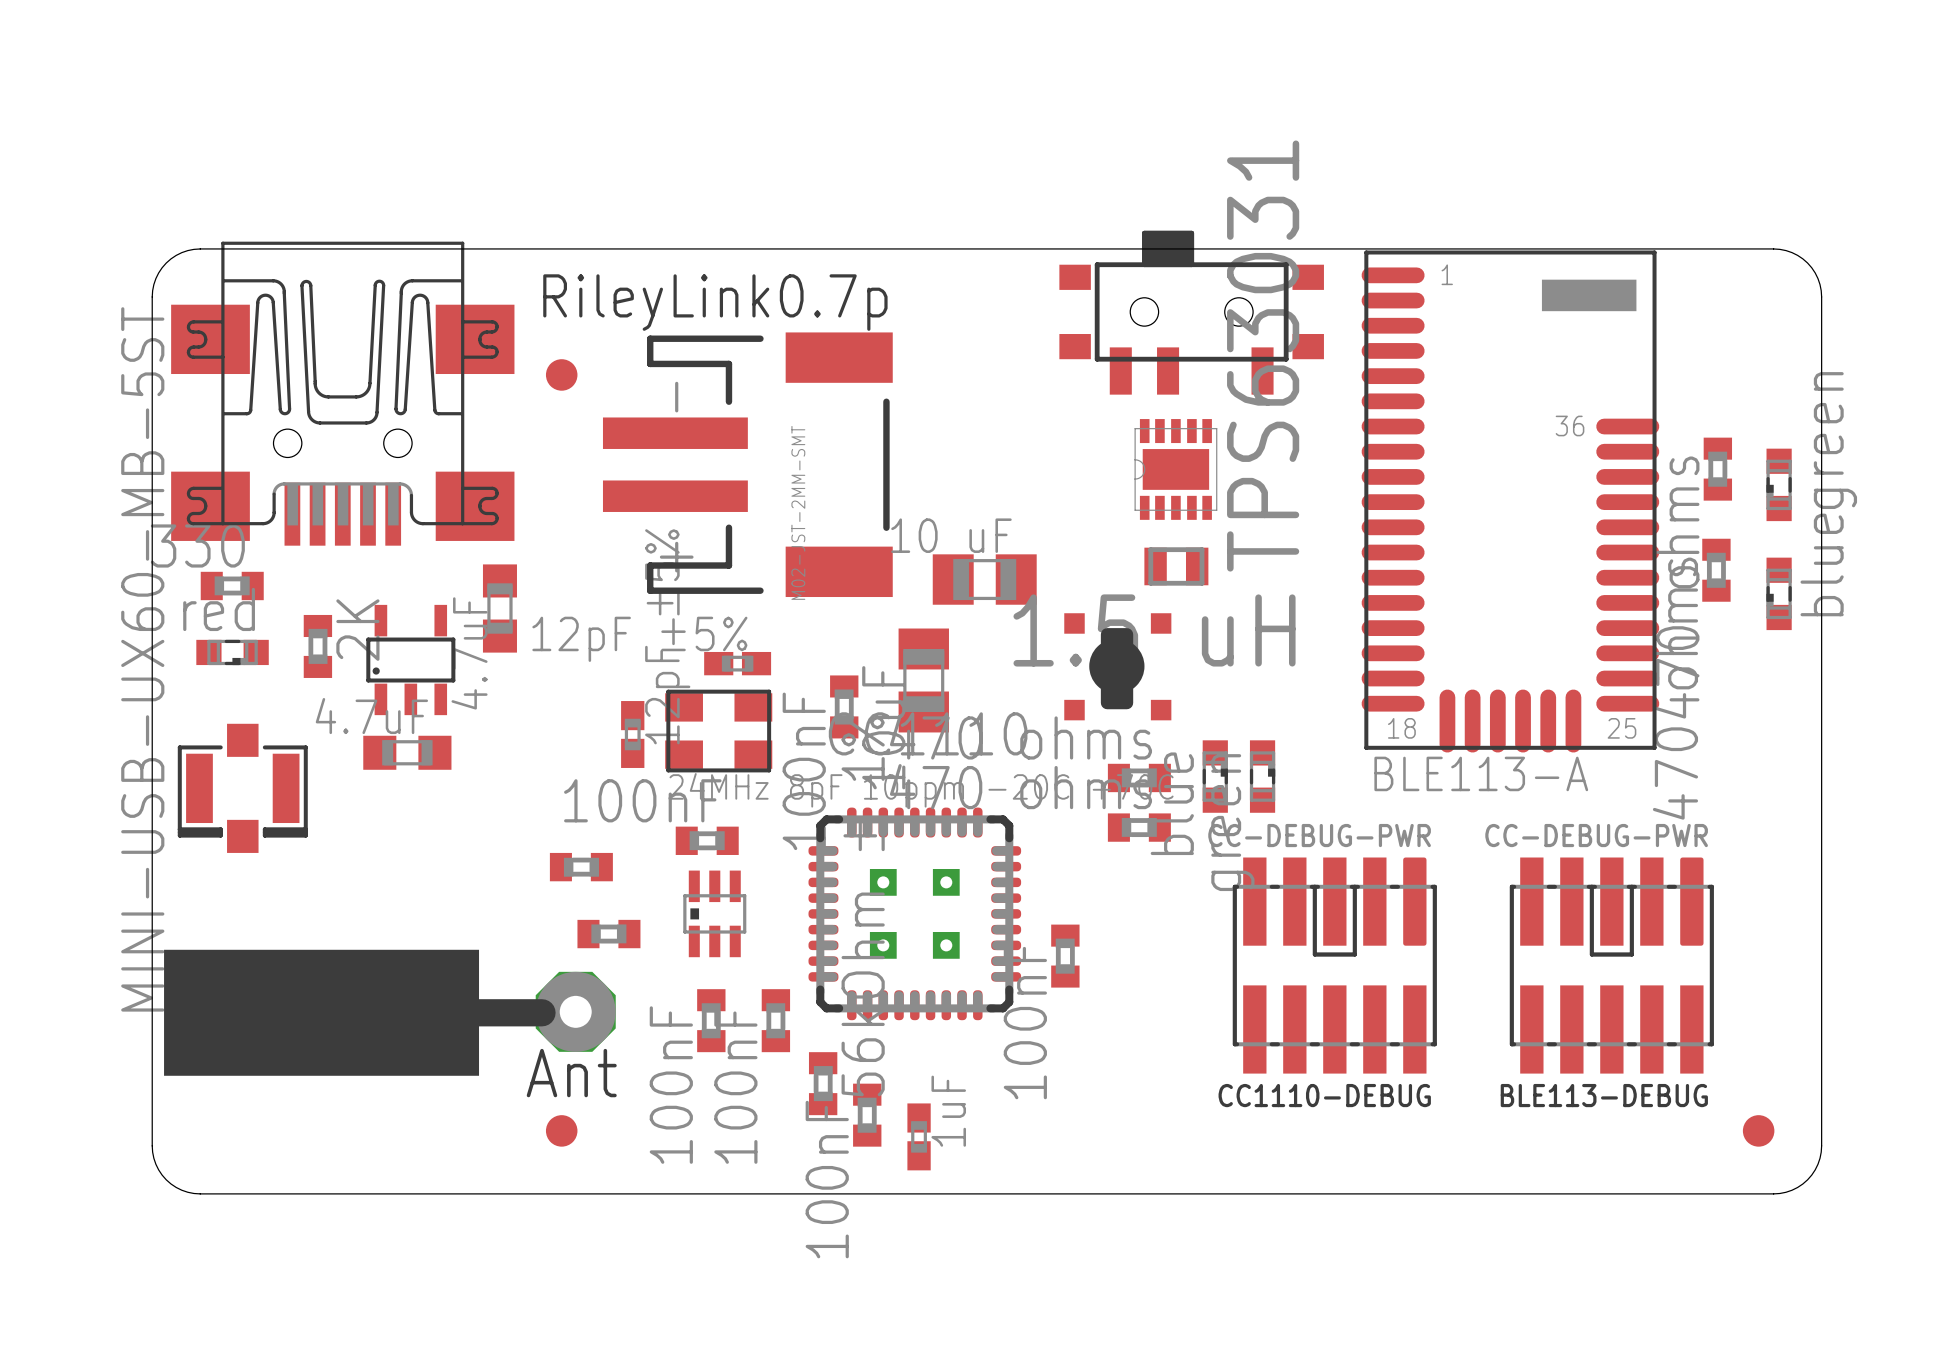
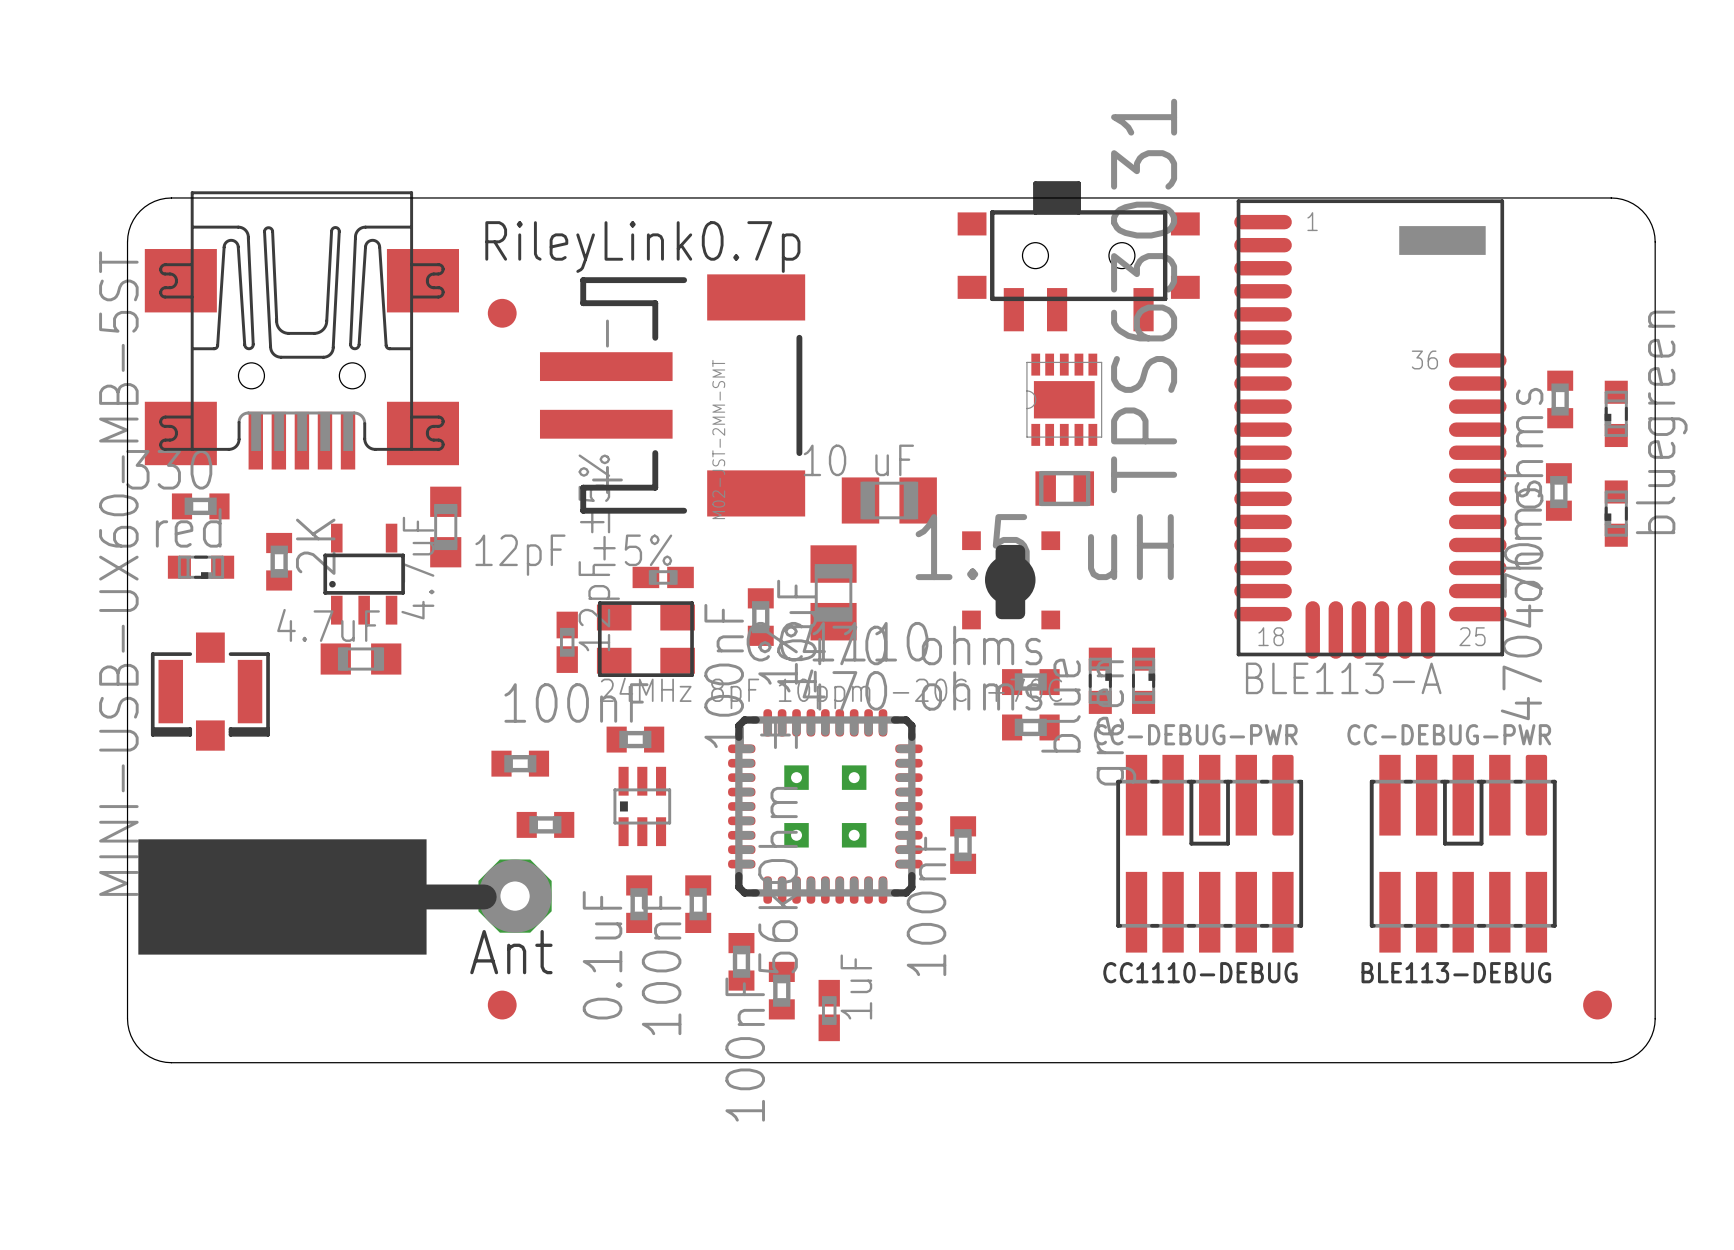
part value: 100nF (671, 1085) -> 0.1uF (602, 955)

